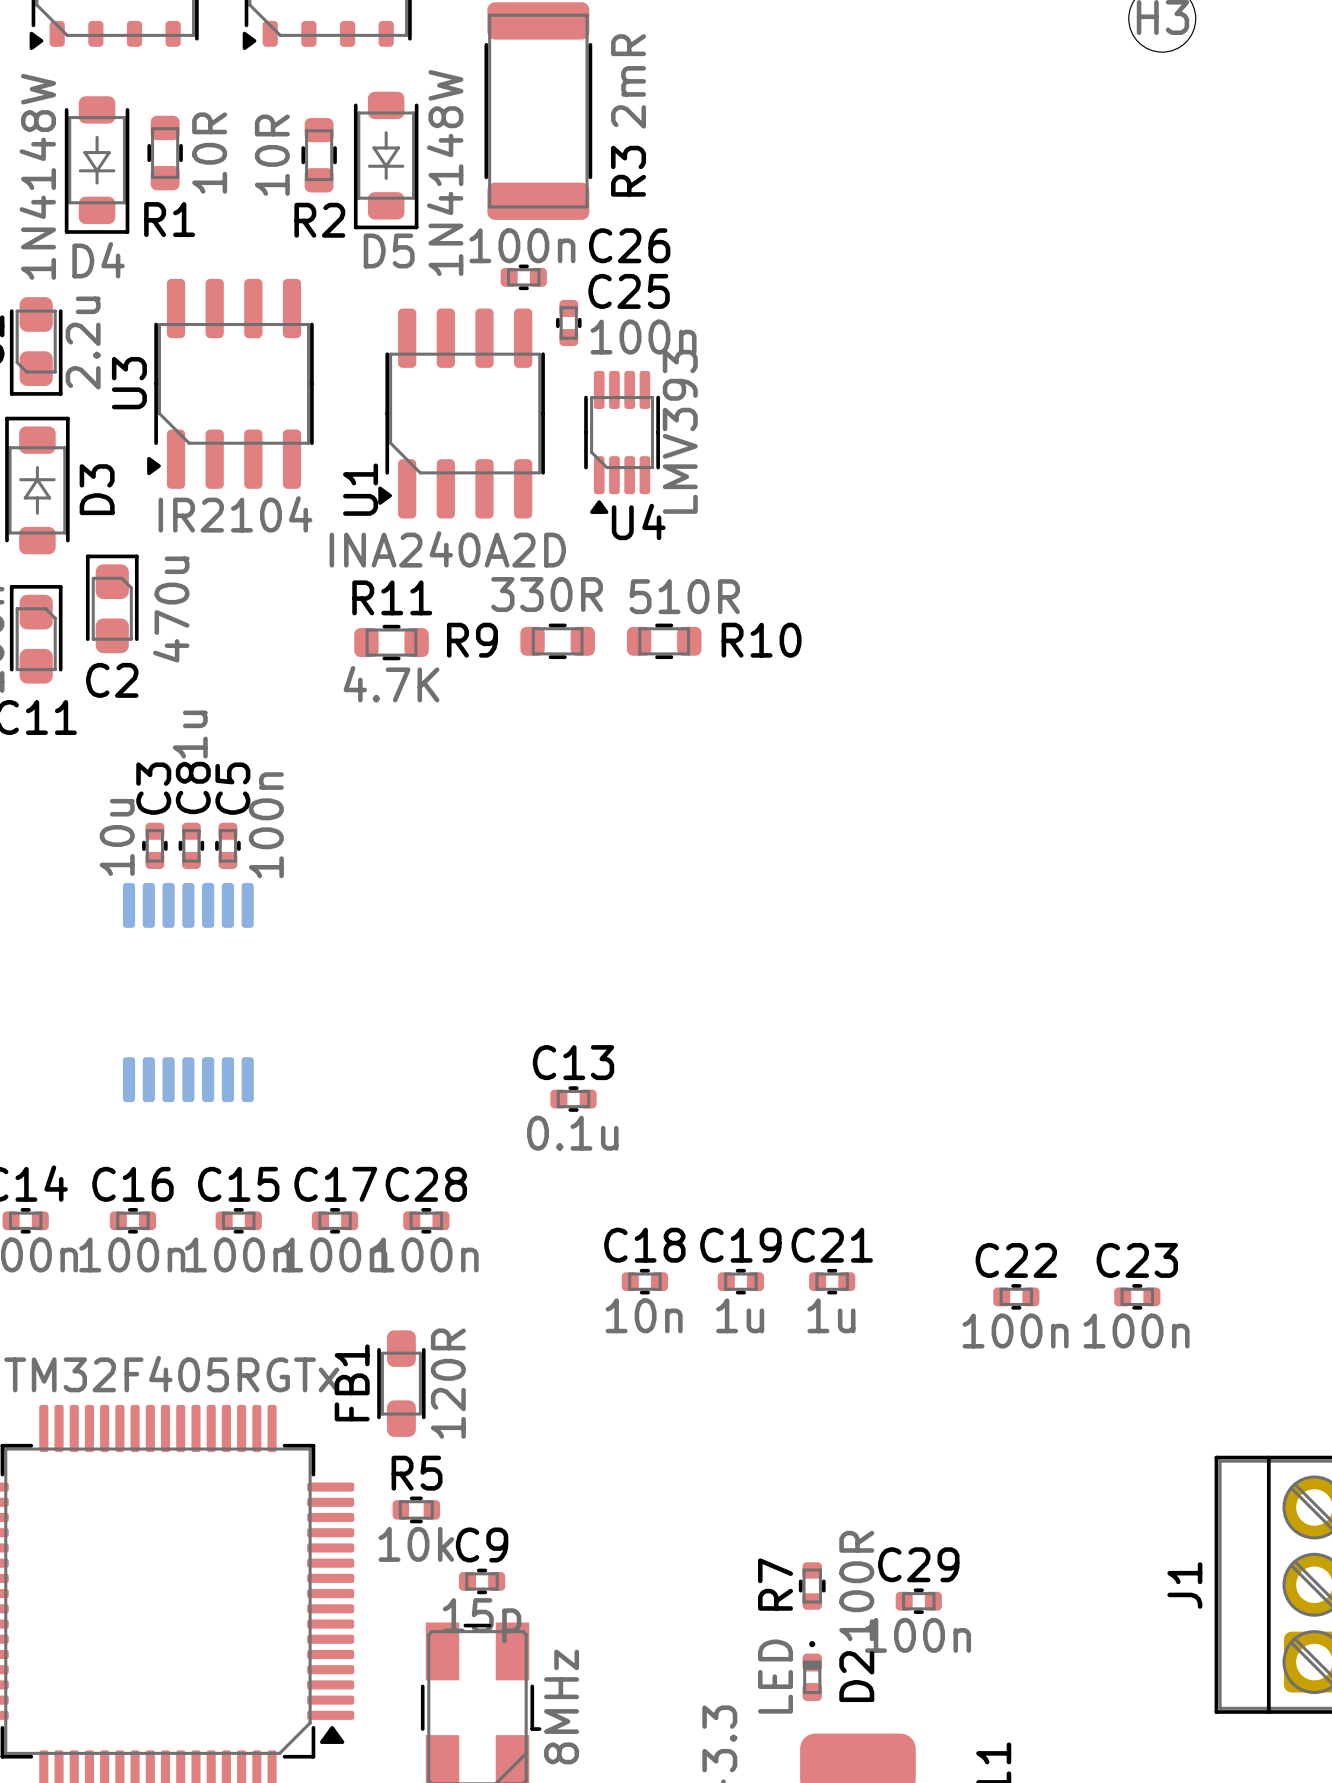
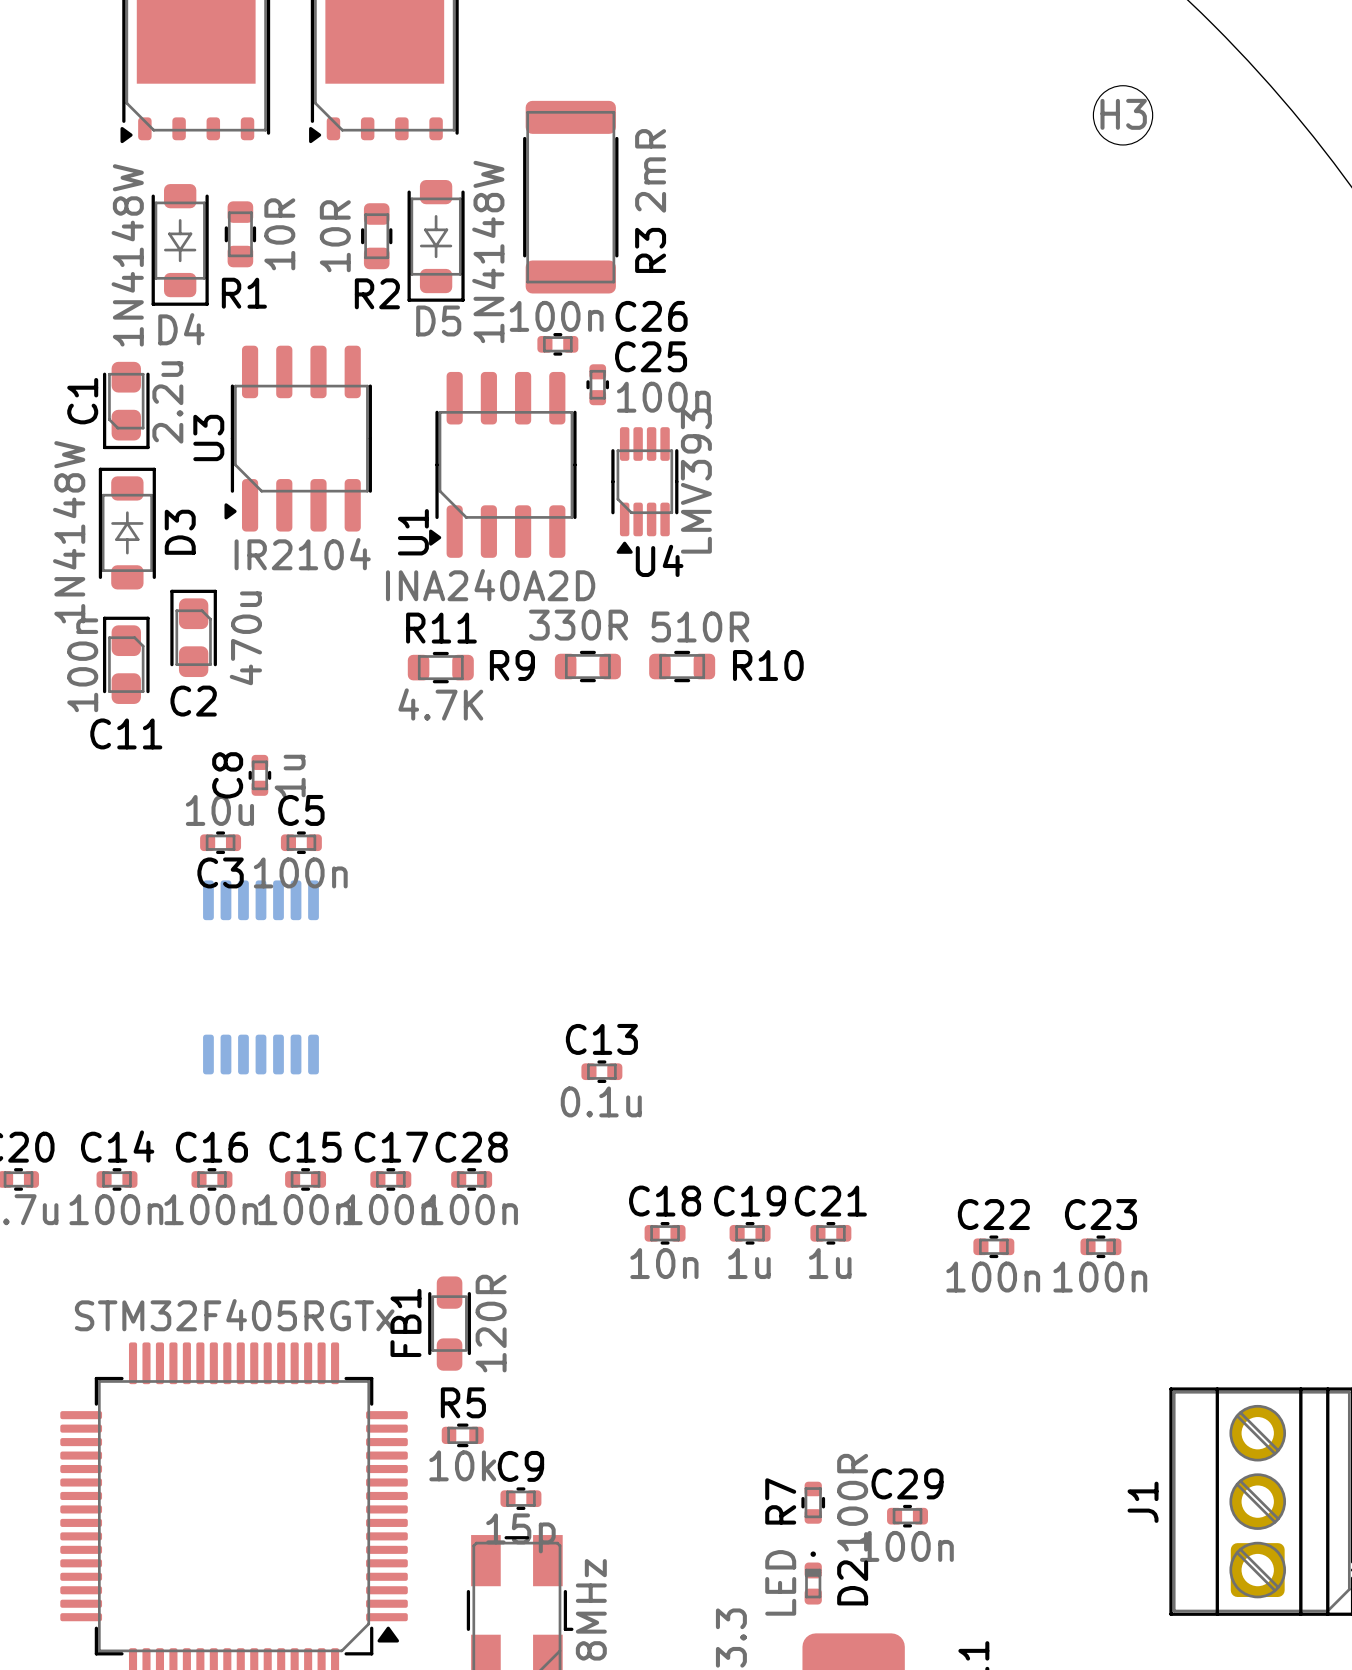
C8 value position: 1u (190, 734) -> 1u (290, 776)
C3 name position: C3 (153, 788) -> C3 (220, 872)
C8 name position: C8 (193, 788) -> C8 (227, 775)
C3 rotation: 0° (154, 845) -> 90° clockwise (220, 842)
C8 position: (191, 845) -> (259, 775)
C5 rotation: 0° (227, 845) -> 90° clockwise (301, 842)

